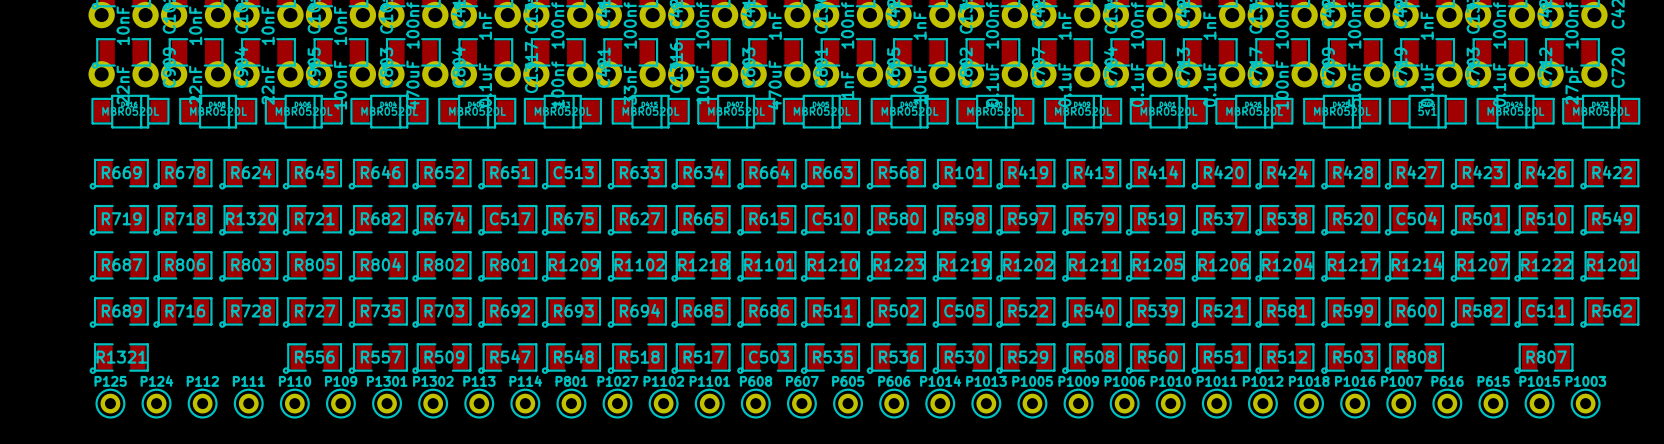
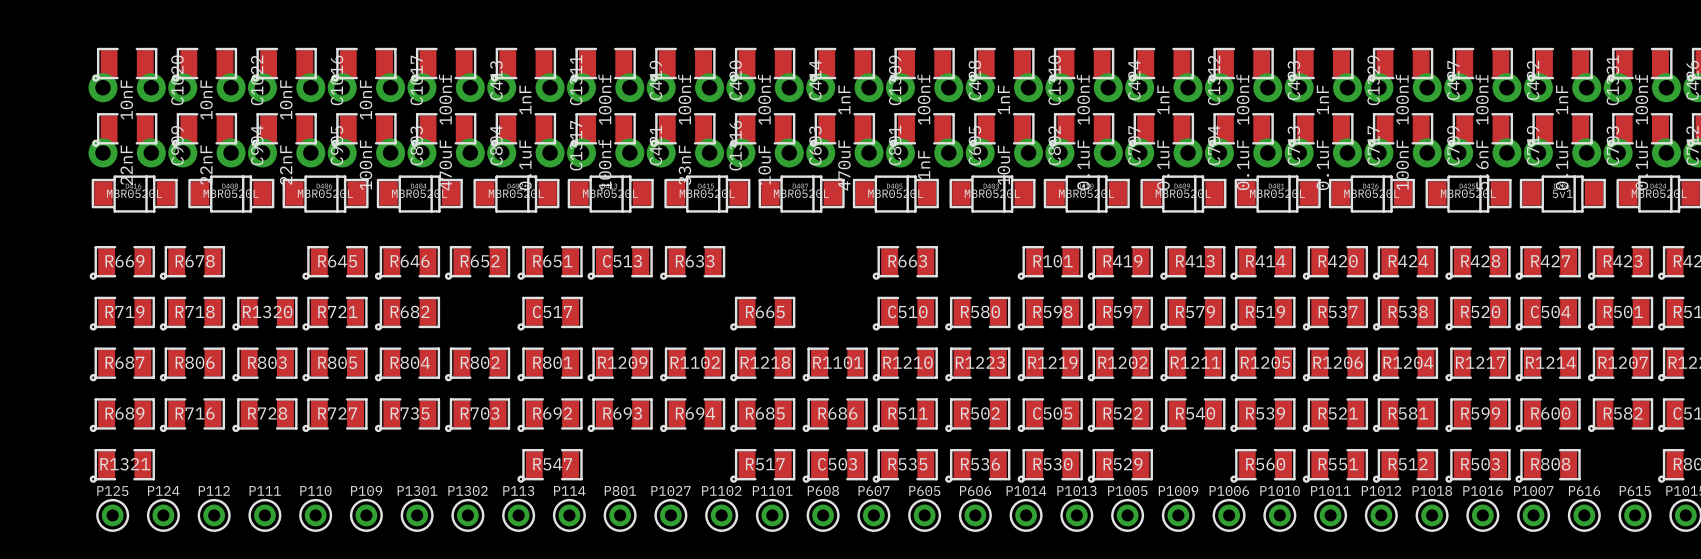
R624: (248, 174) -> none
R634: (700, 174) -> none
R664: (766, 174) -> none
R568: (896, 174) -> none
R674: (441, 220) -> none
R675: (571, 220) -> none
R627: (637, 220) -> none
R615: (766, 220) -> none
R556: (312, 358) -> none
R557: (378, 358) -> none
R509: (441, 358) -> none
R548: (571, 358) -> none
R518: (637, 358) -> none
R508: (1091, 358) -> none

